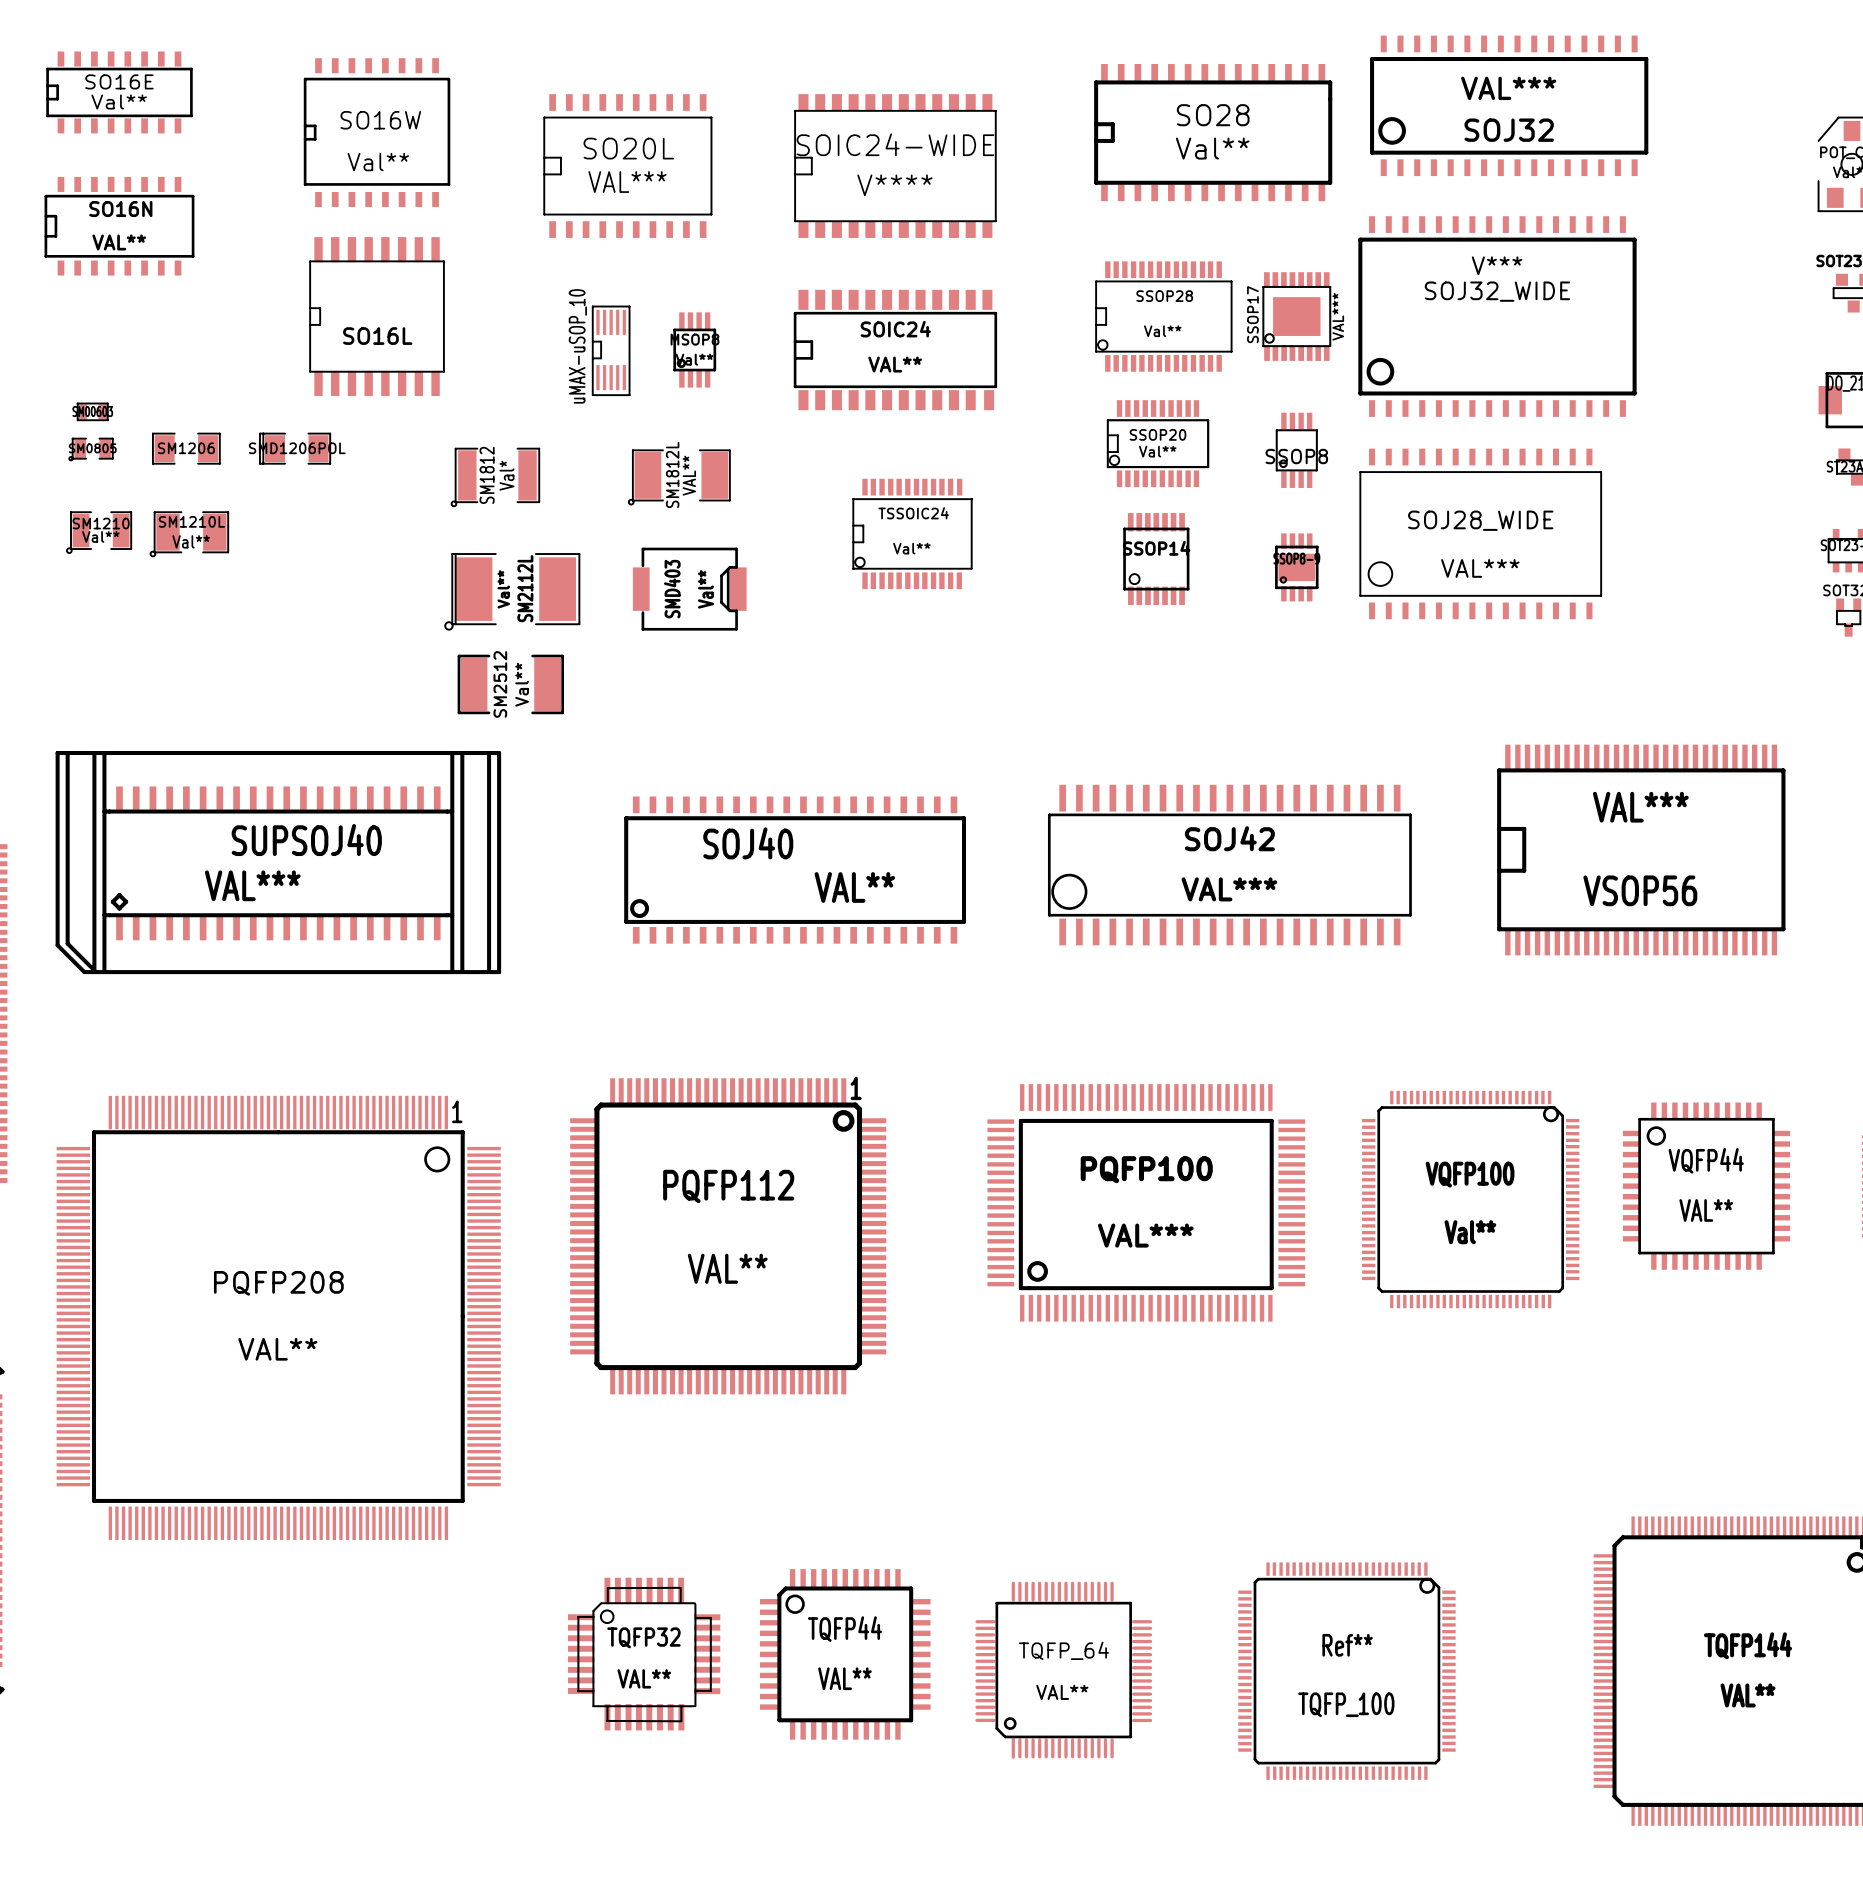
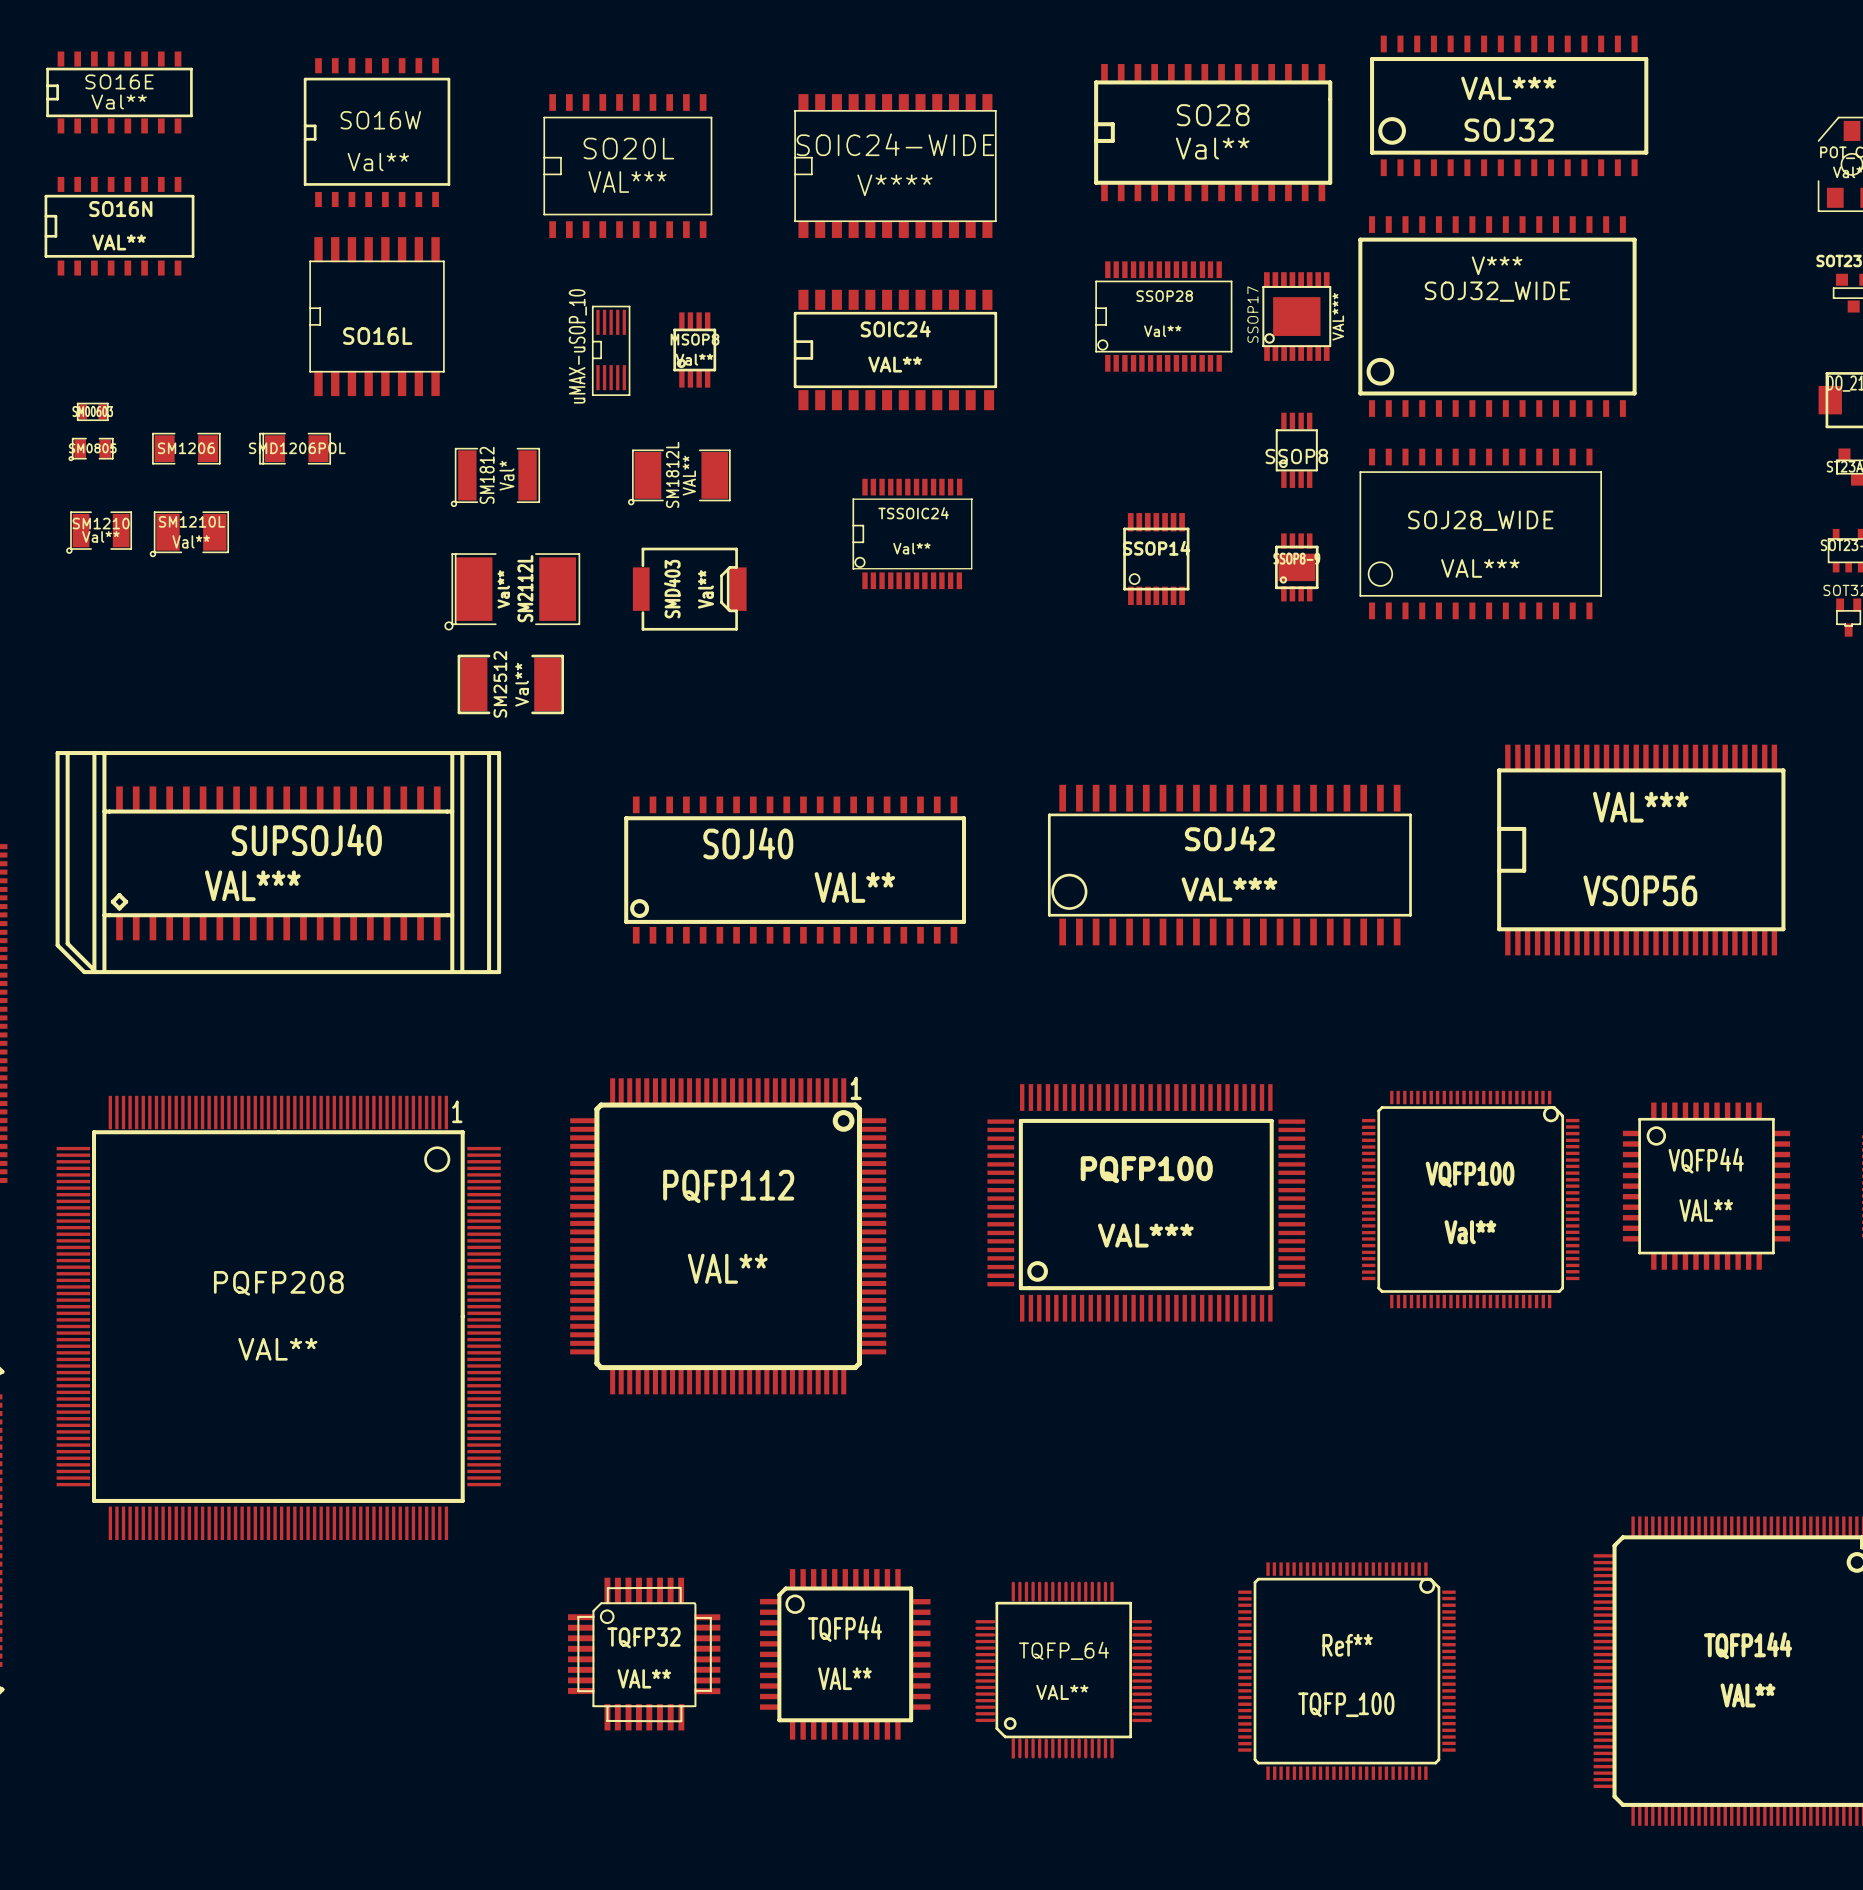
SSOP20: Val** (1157, 443) -> none

